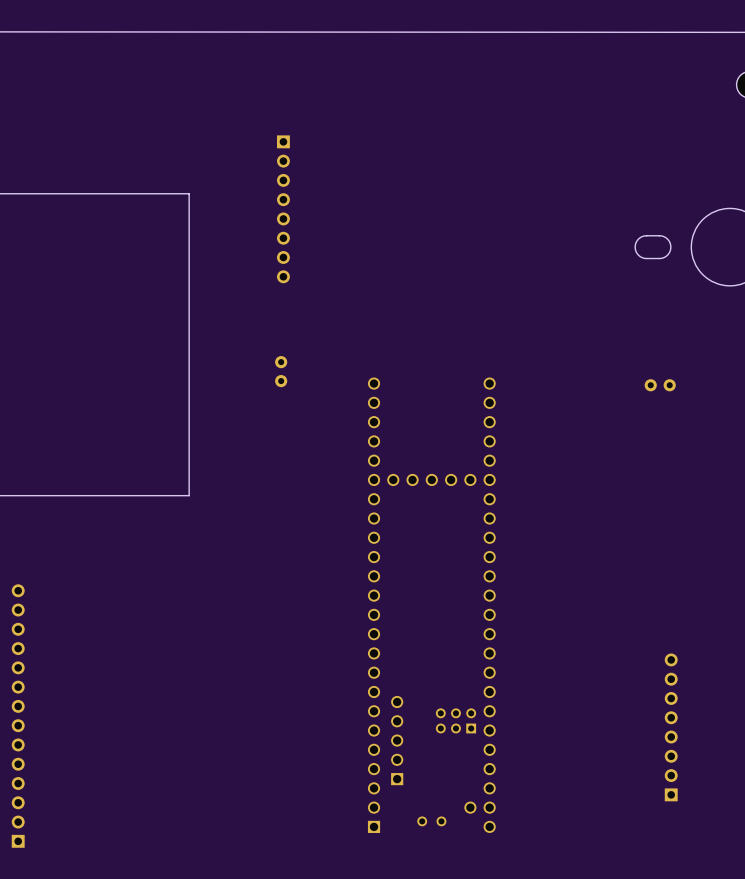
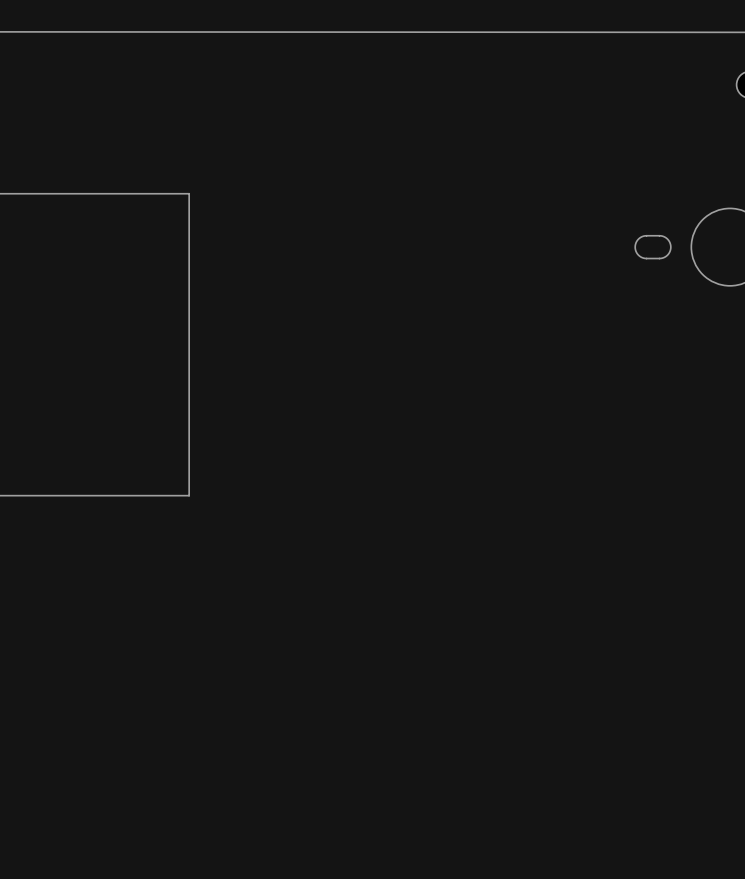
part: (283, 209) -> none
part: (281, 371) -> none
part: (660, 385) -> none
part: (431, 605) -> none
part: (18, 716) -> none
part: (671, 727) -> none

